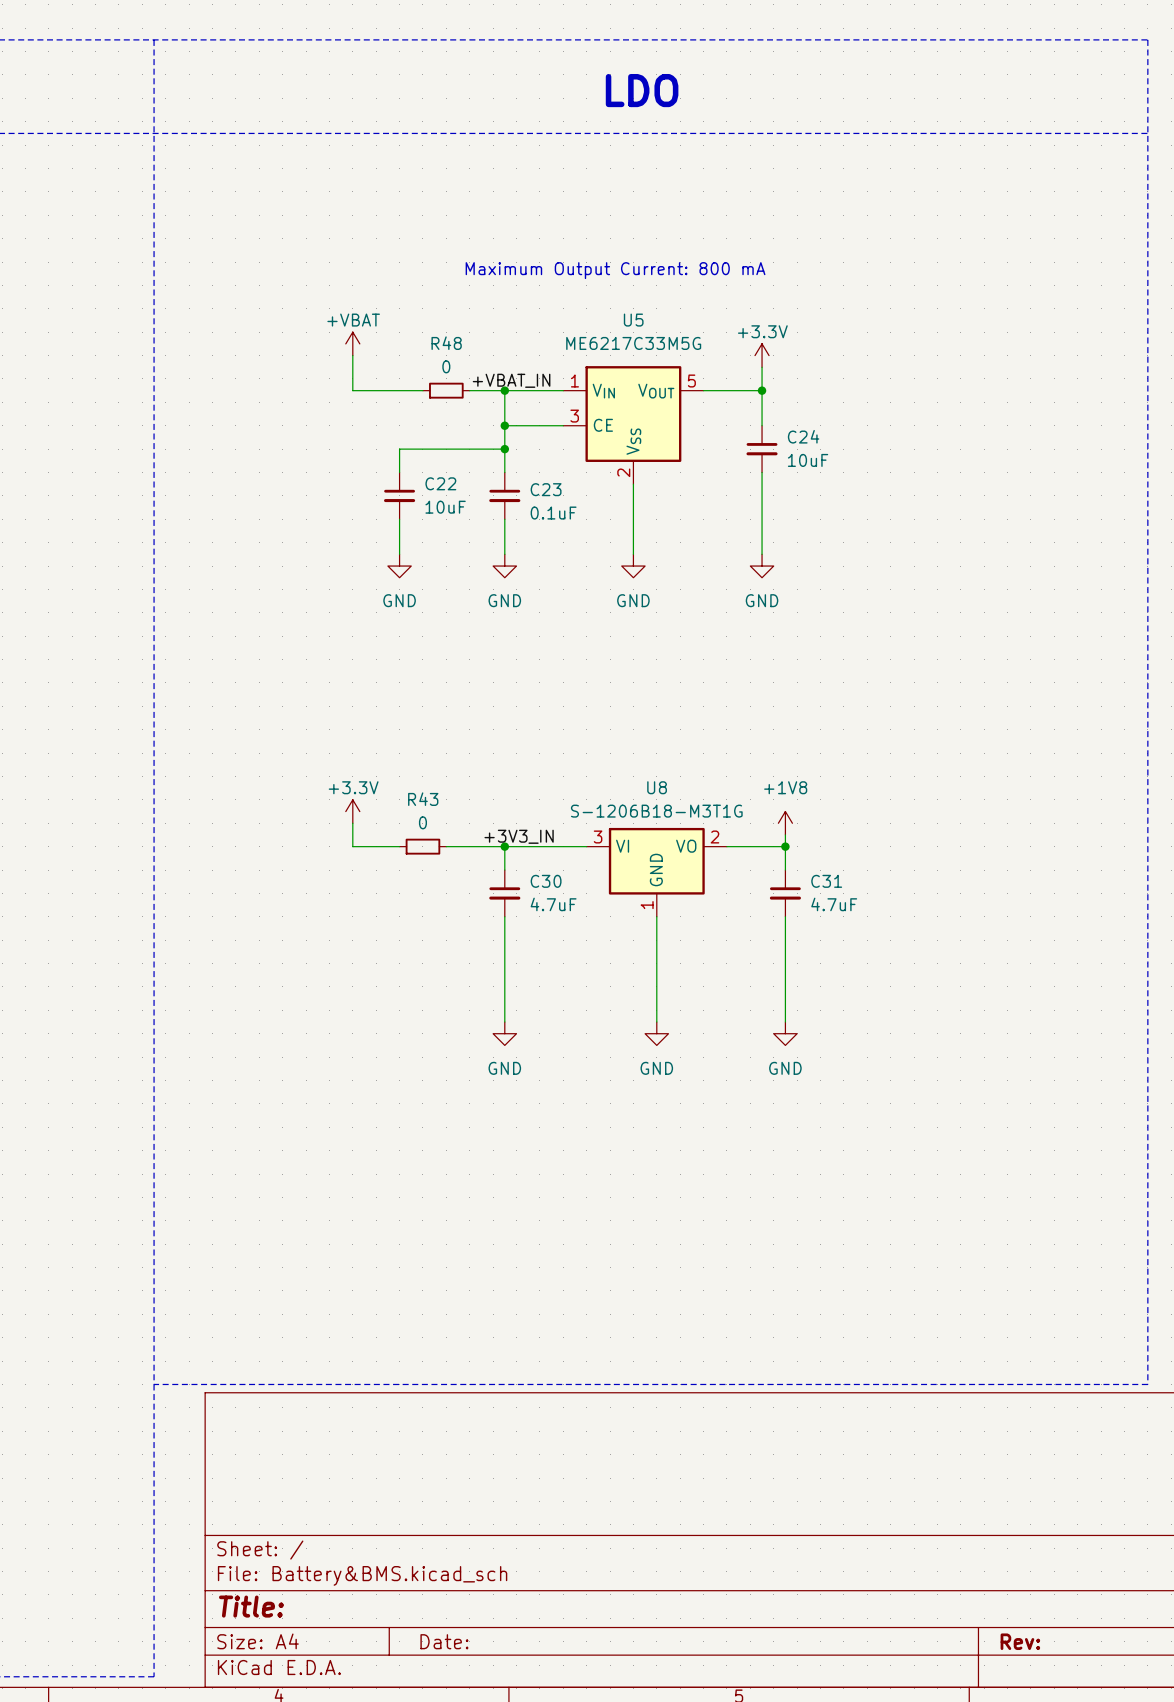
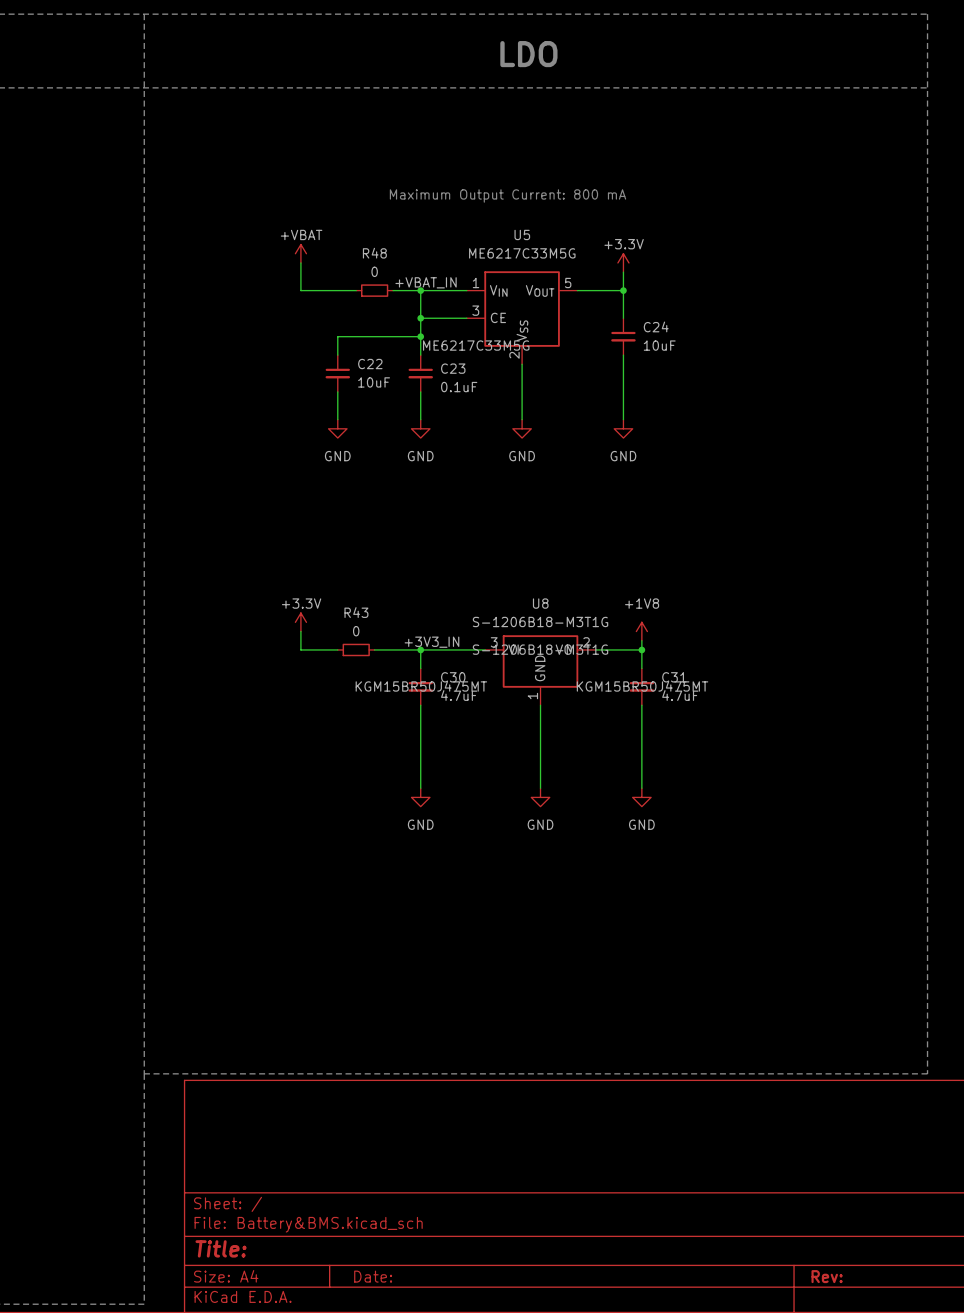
U5 text: none -> ME6217C33M5G (476, 345)
U8 text: none -> S-1206B18-M3T1G (540, 649)
C30 text: none -> KGM15BR50J475MT (421, 686)
C31 text: none -> KGM15BR50J475MT (642, 686)

